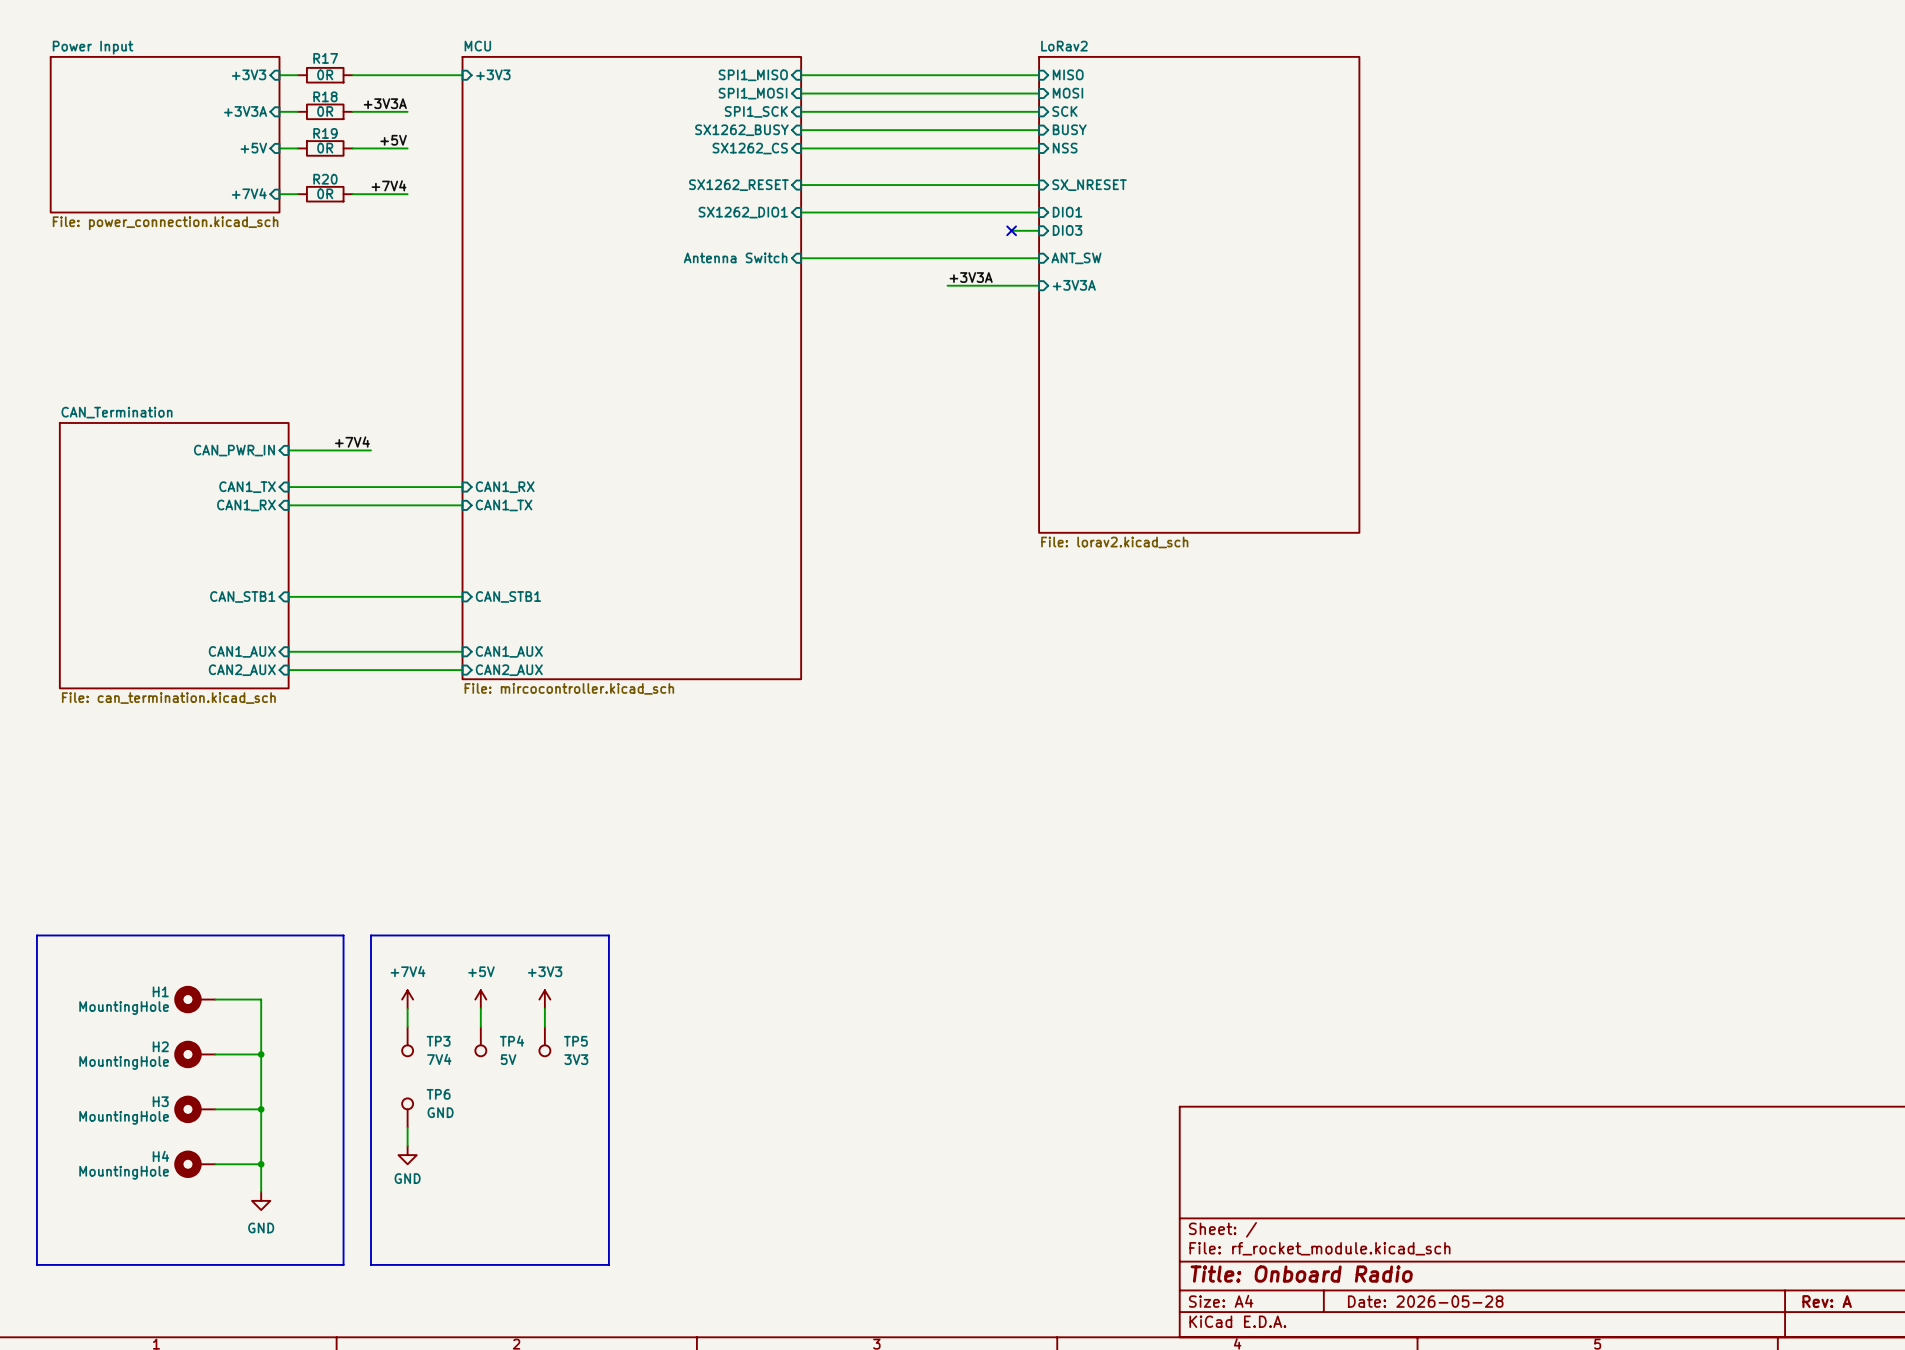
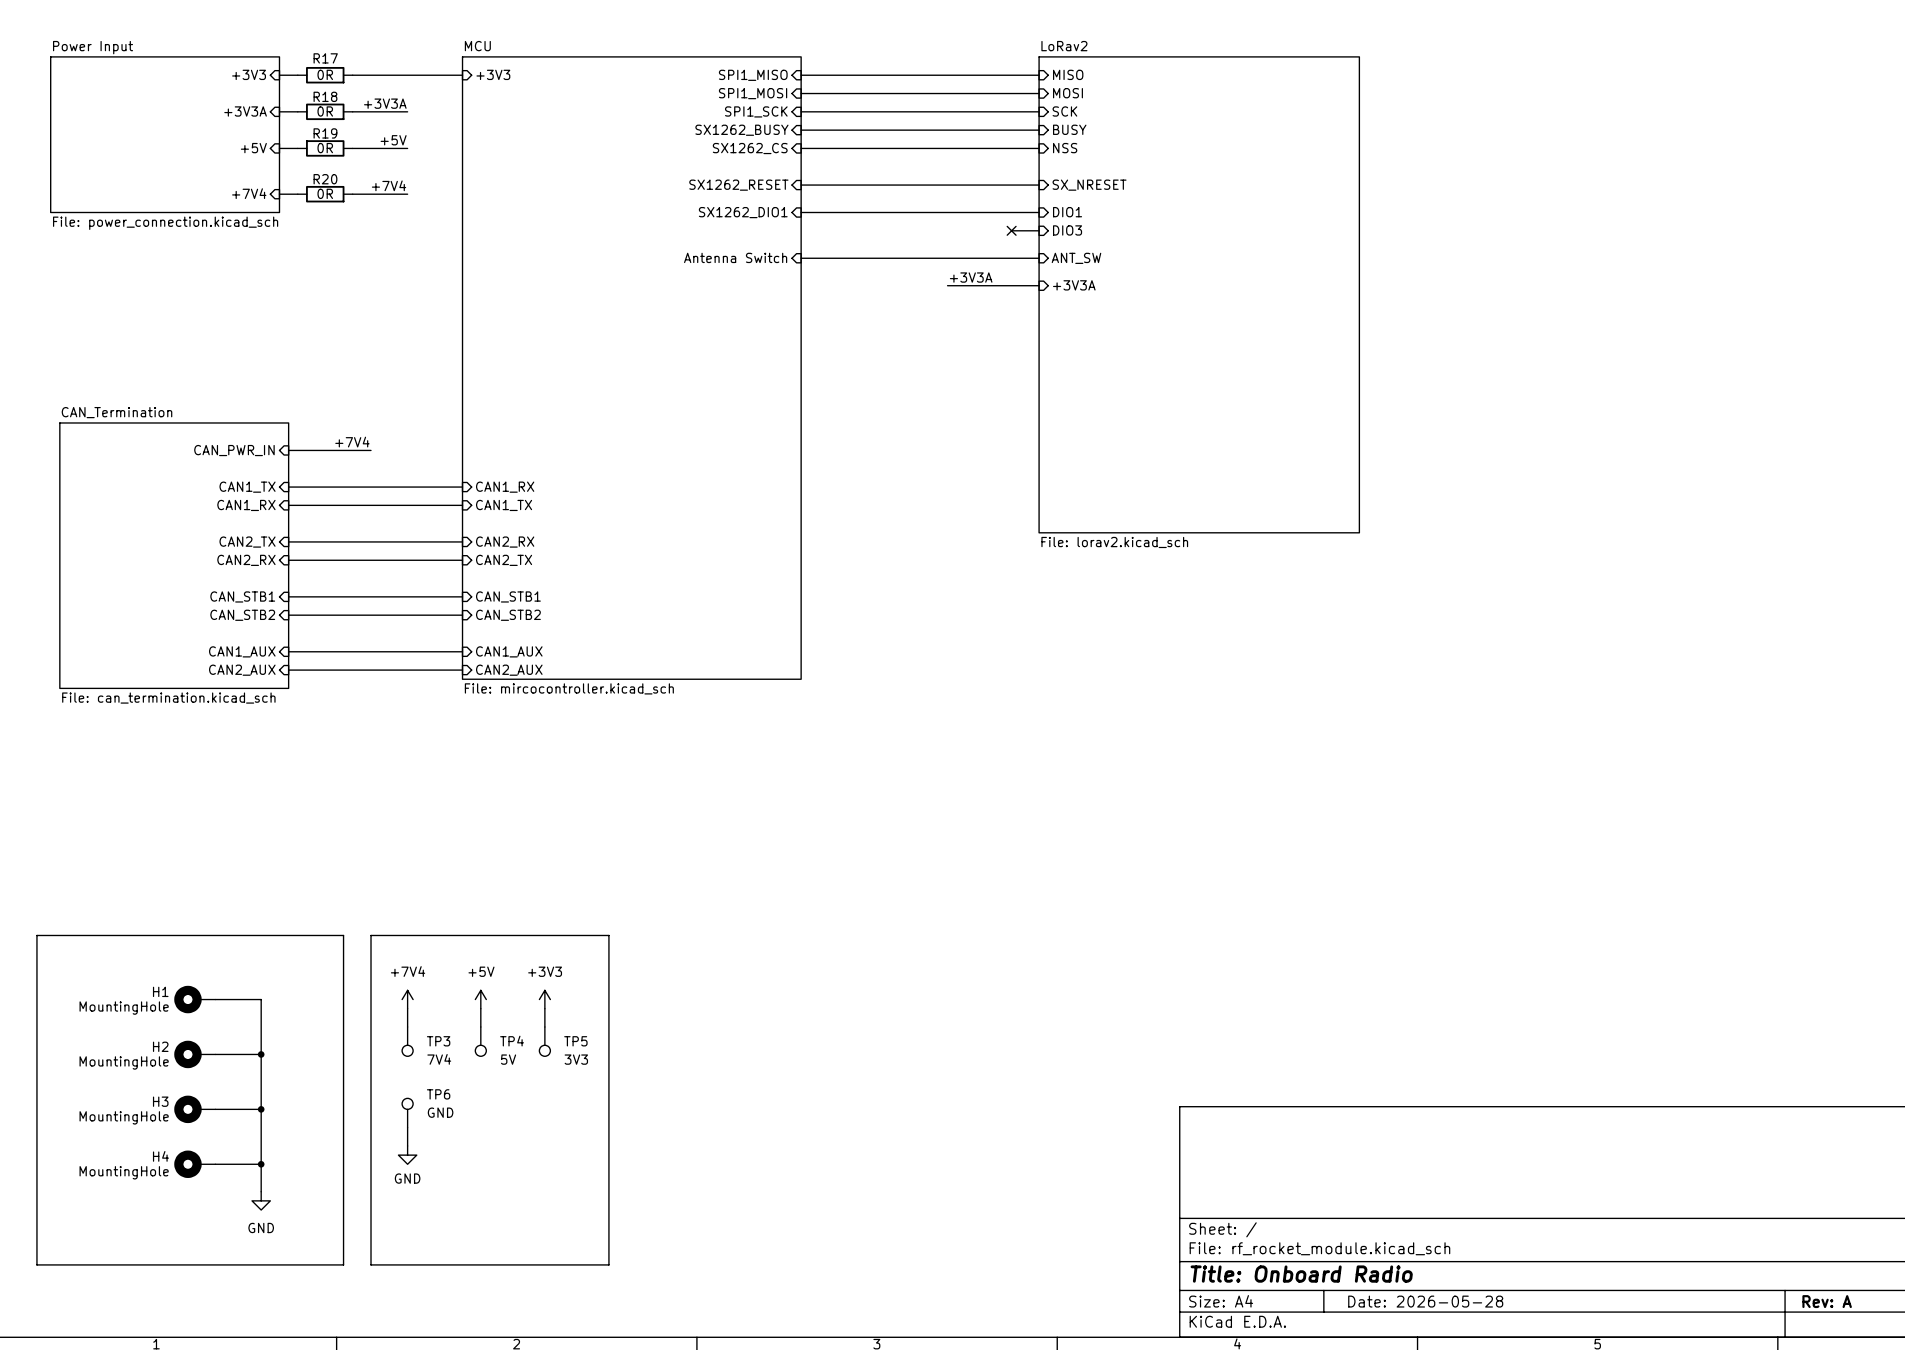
wire: none -> (288, 541) (462, 541)
sheet pin: none -> CAN2_TX (247, 542)
sheet pin: none -> CAN2_RX (505, 542)
sheet pin: none -> CAN2_RX (246, 560)
wire: none -> (288, 560) (462, 560)
sheet pin: none -> CAN2_TX (504, 560)
sheet pin: none -> CAN_STB2 (242, 615)
wire: none -> (288, 615) (462, 615)
sheet pin: none -> CAN_STB2 (508, 615)

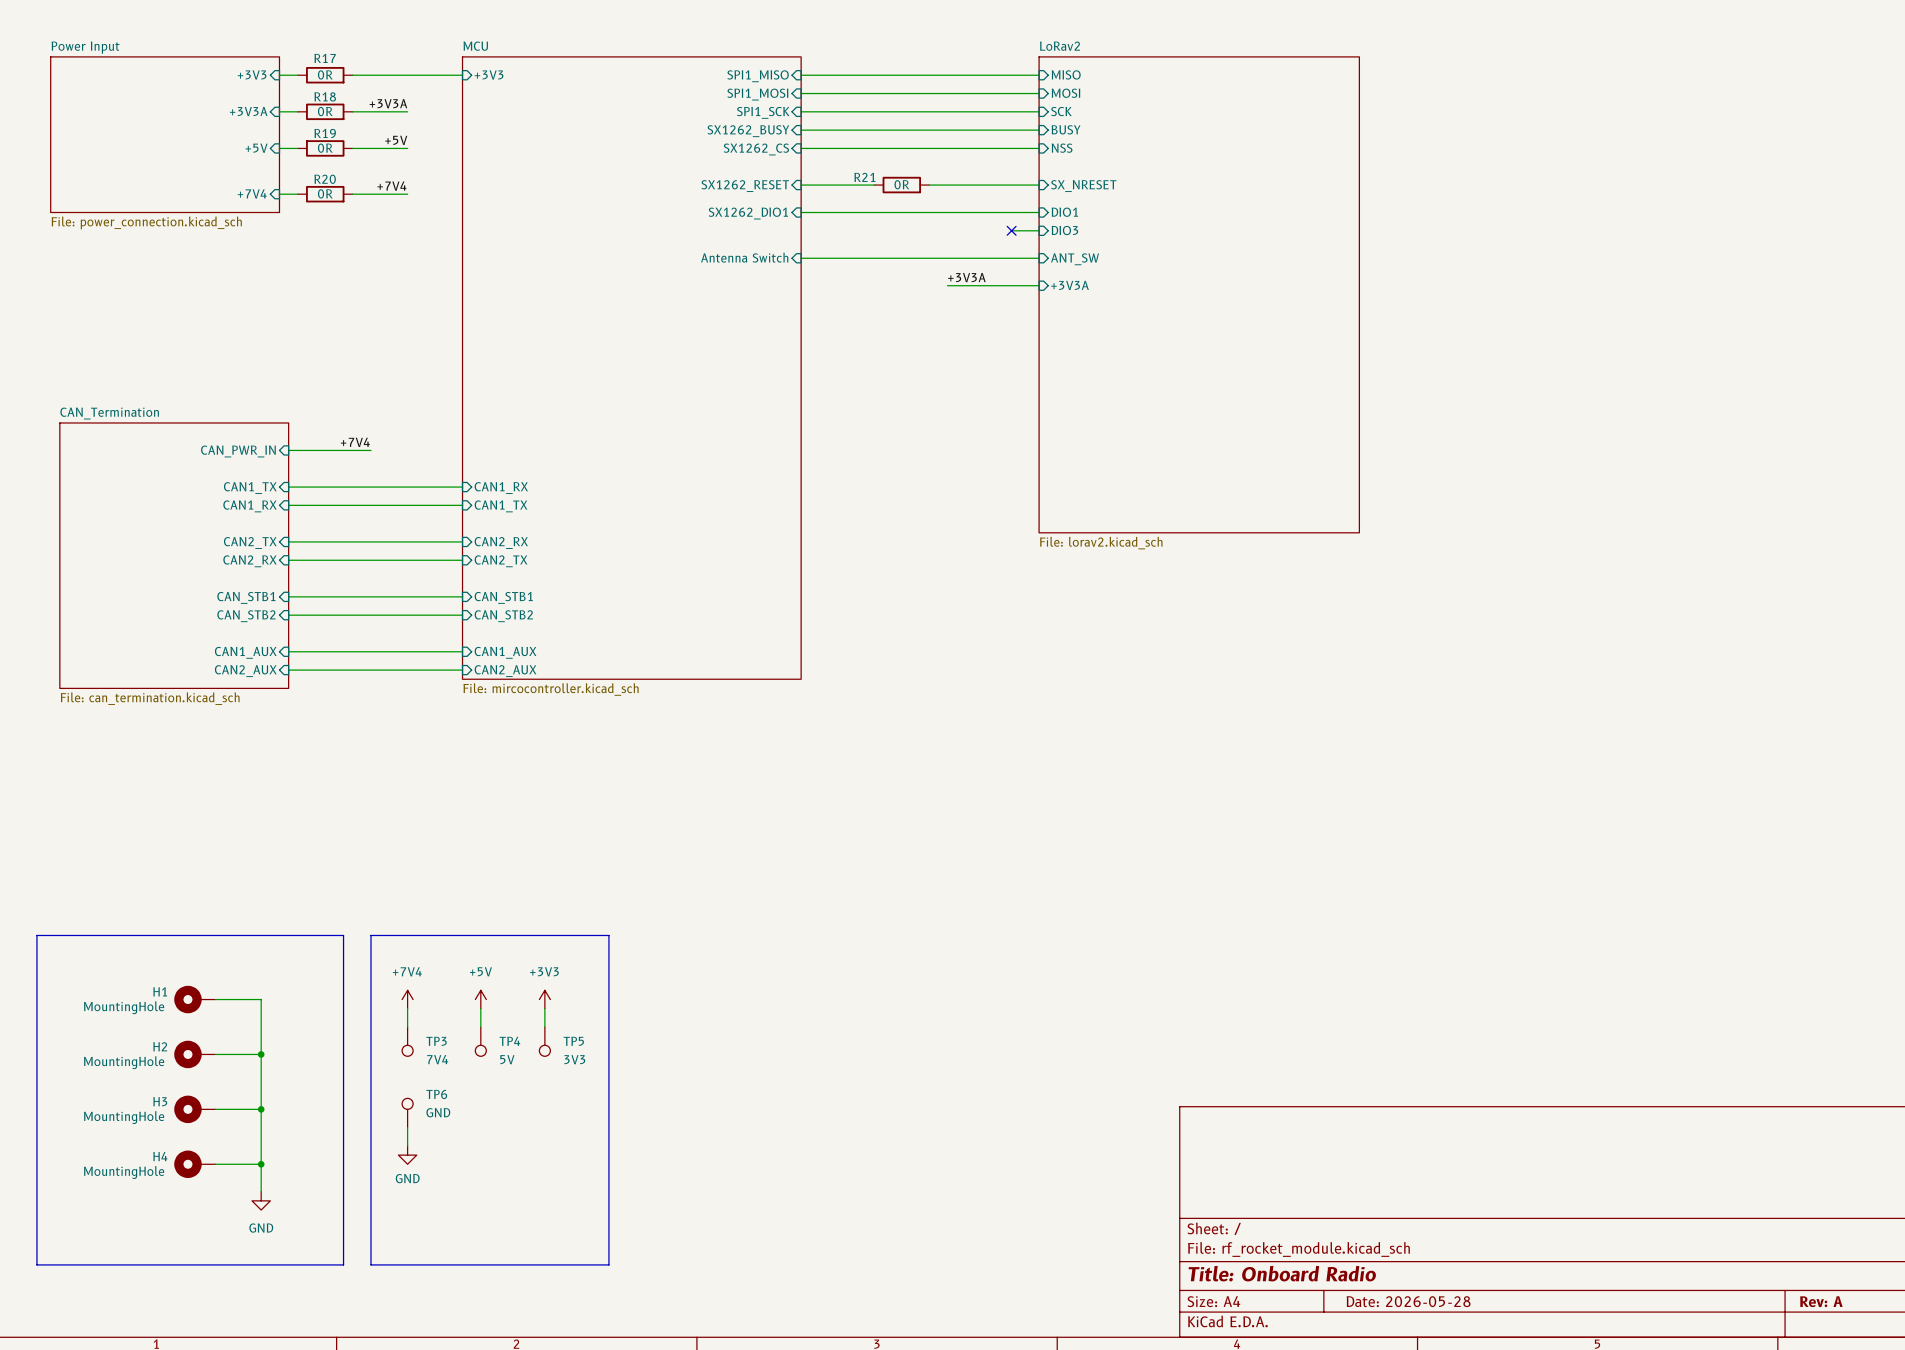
wire: (874, 185) (929, 185) -> none
R21: none -> 0R (901, 185)

